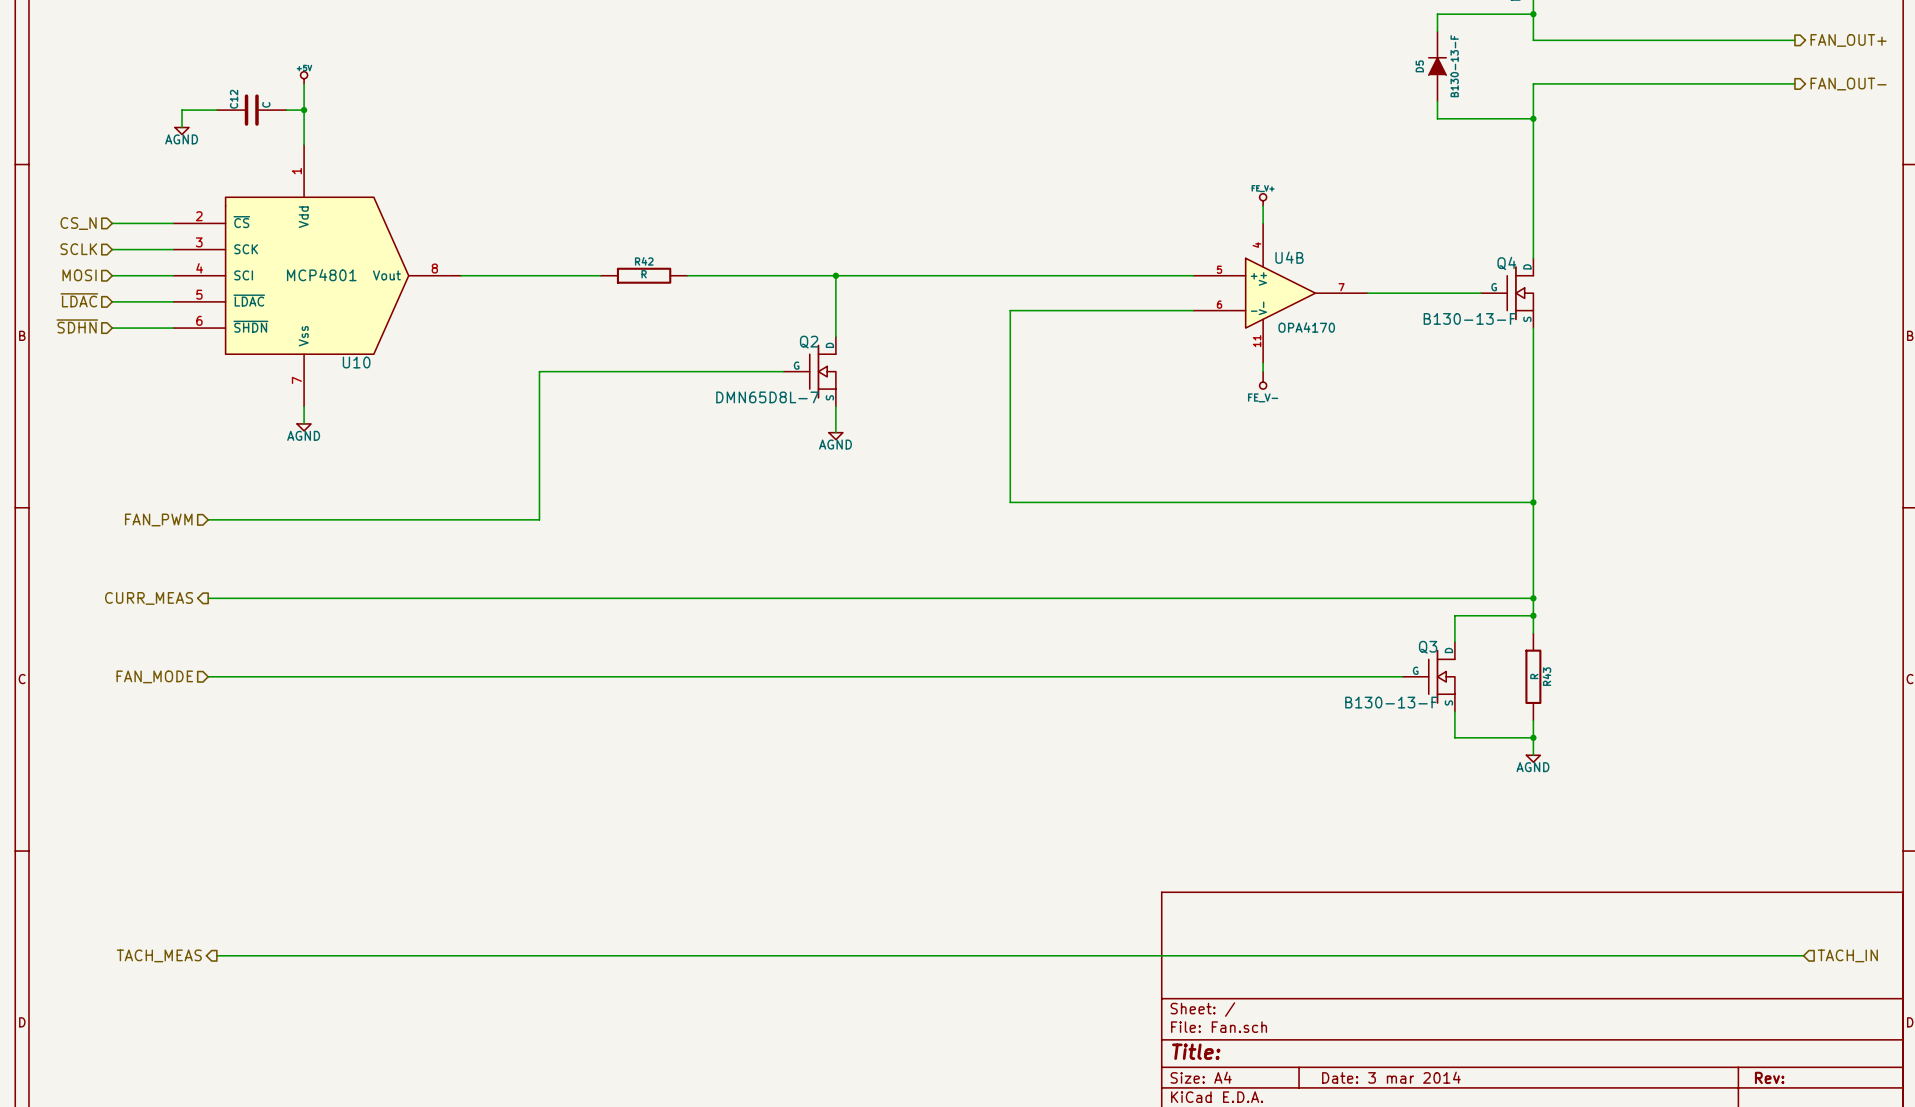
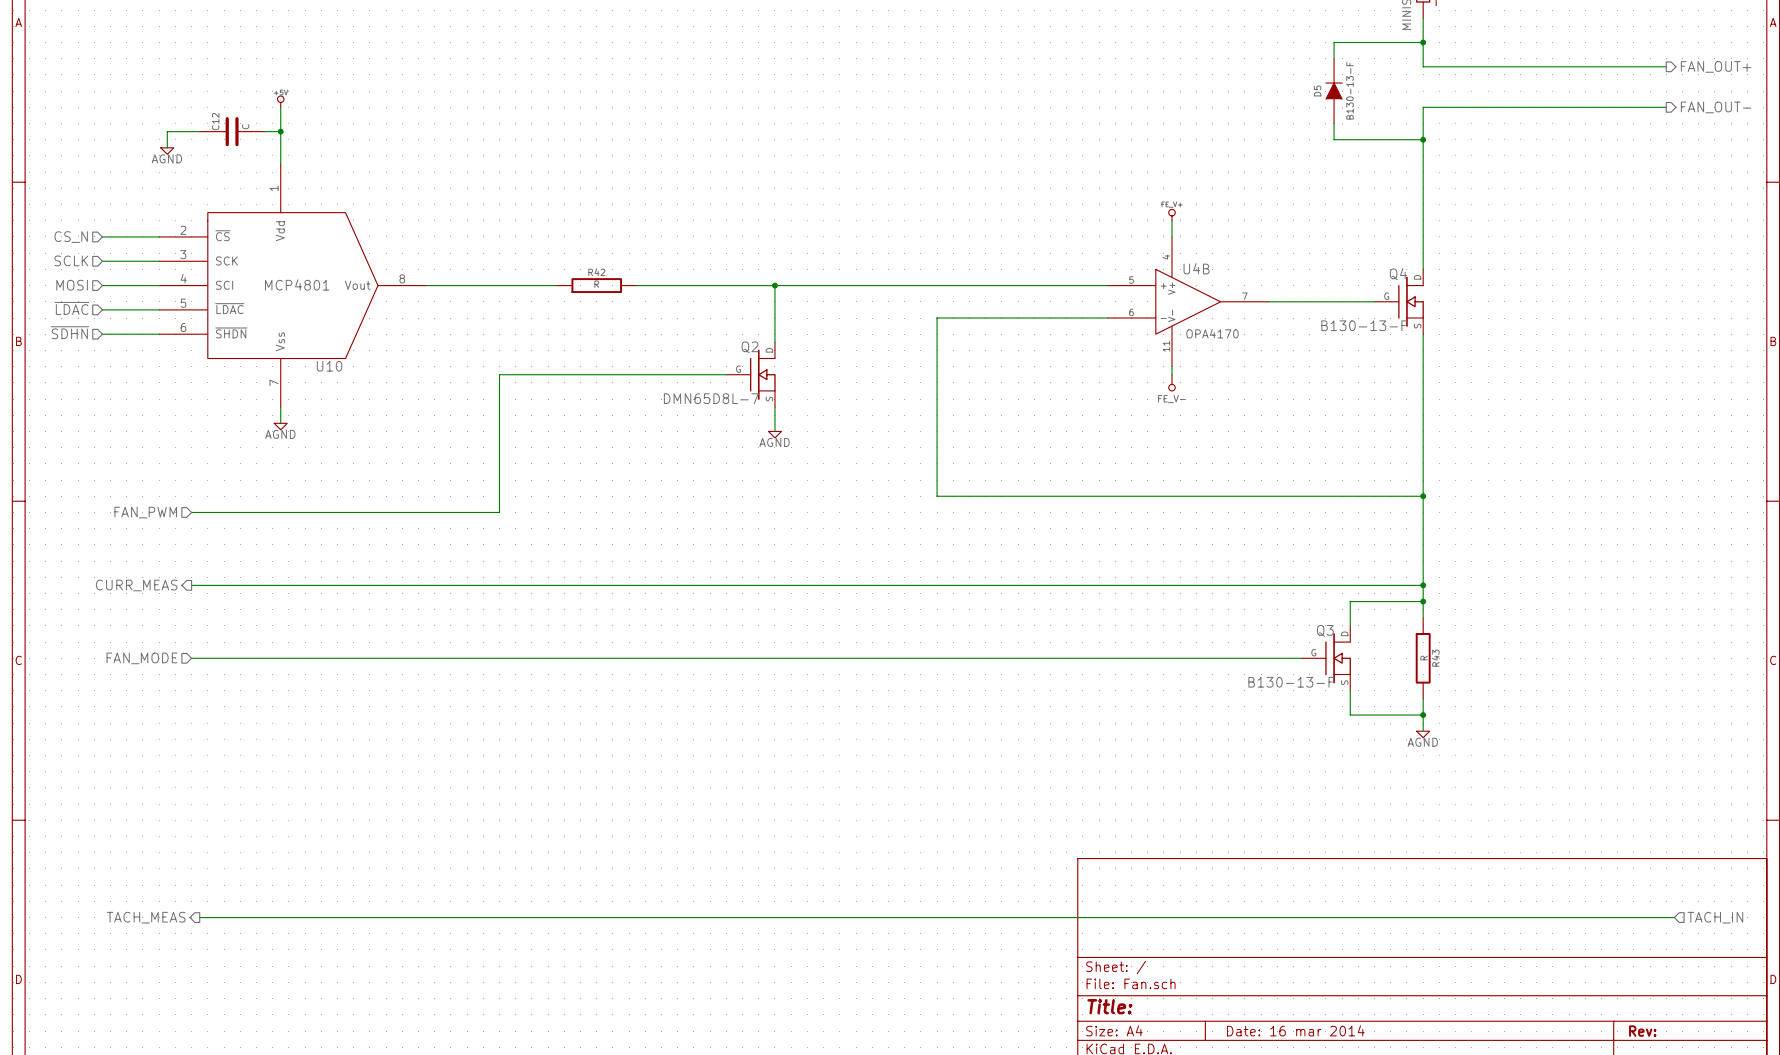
title block: Date: 3 mar 2014 (1391, 1077) -> Date: 16 mar 2014 (1295, 1030)

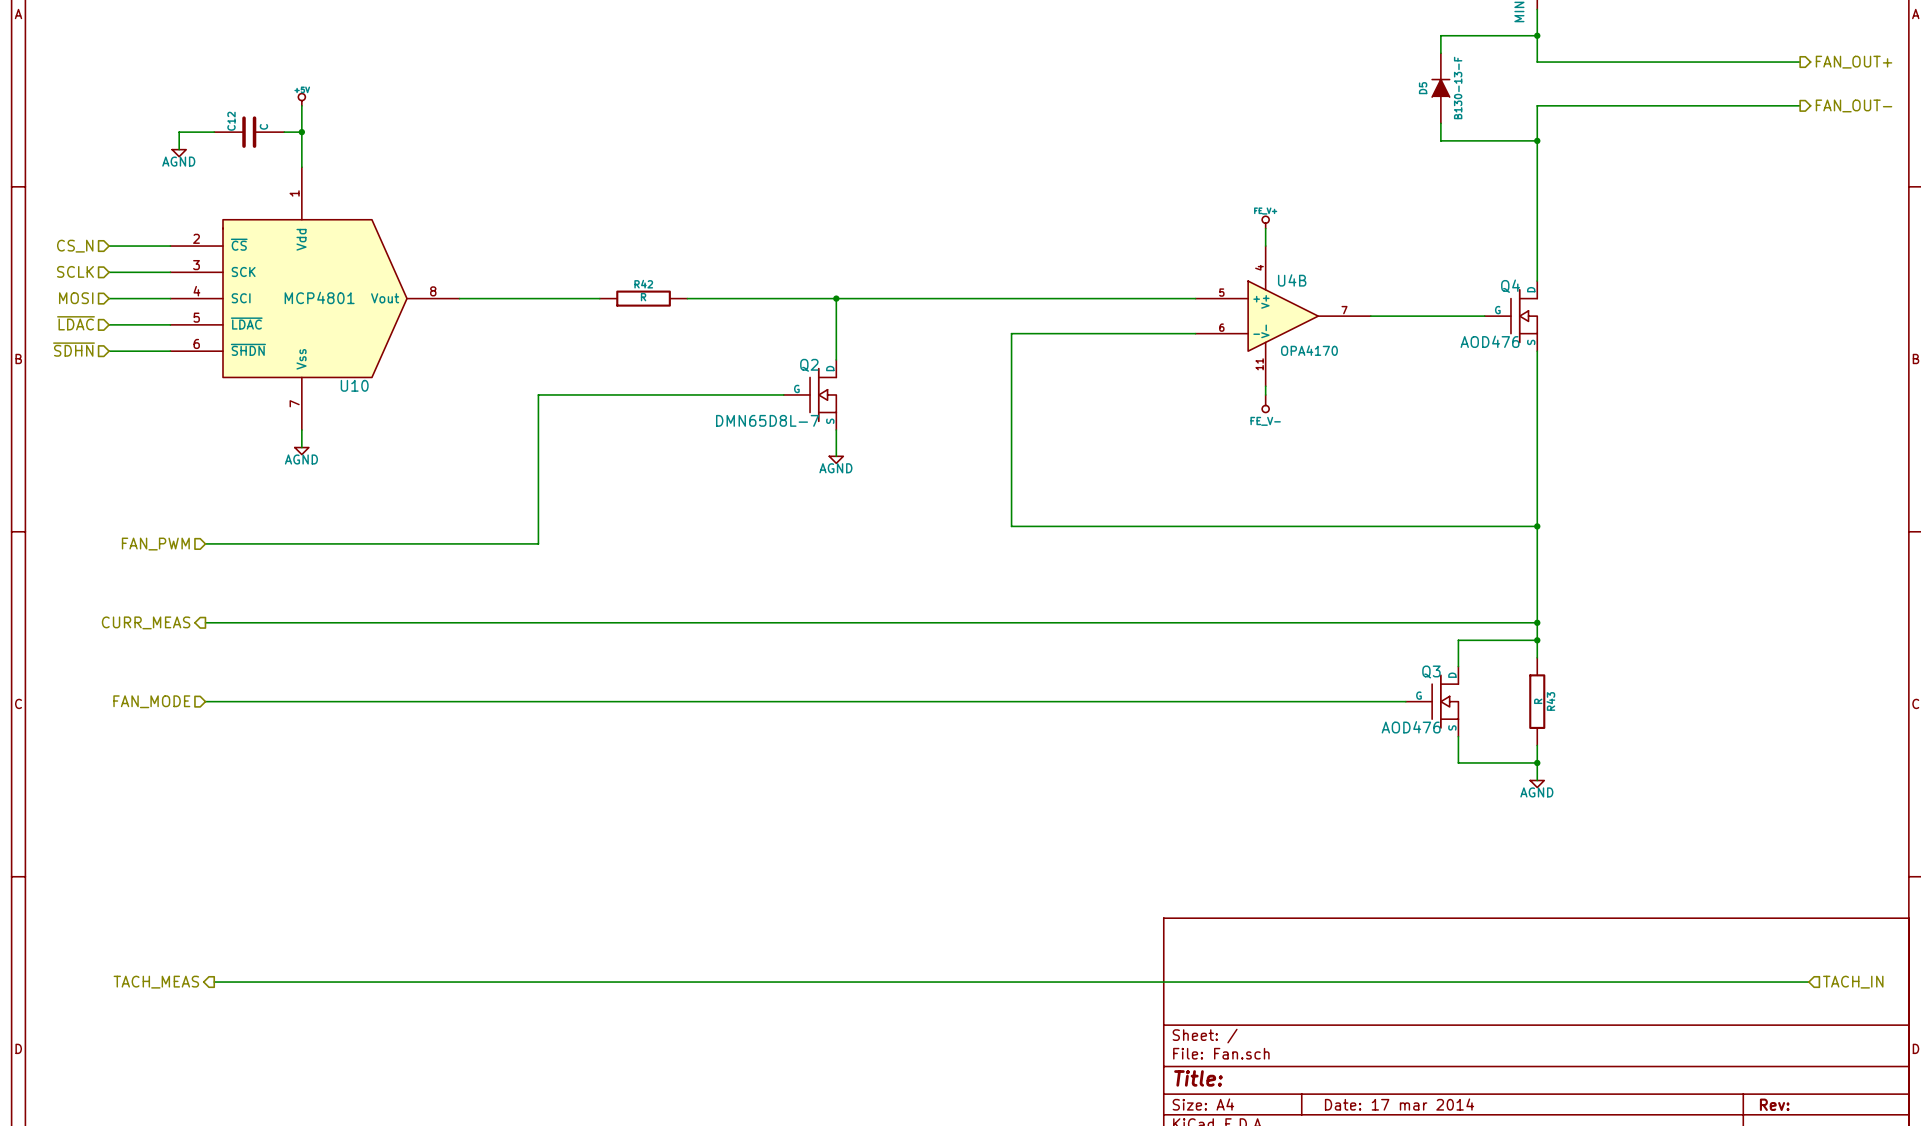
Q4 value: B130-13-F (1364, 325) -> AOD476 (1490, 341)
Q3 value: B130-13-F (1291, 682) -> AOD476 (1411, 727)
title block: Date: 16 mar 2014 (1295, 1030) -> Date: 17 mar 2014 (1399, 1104)

